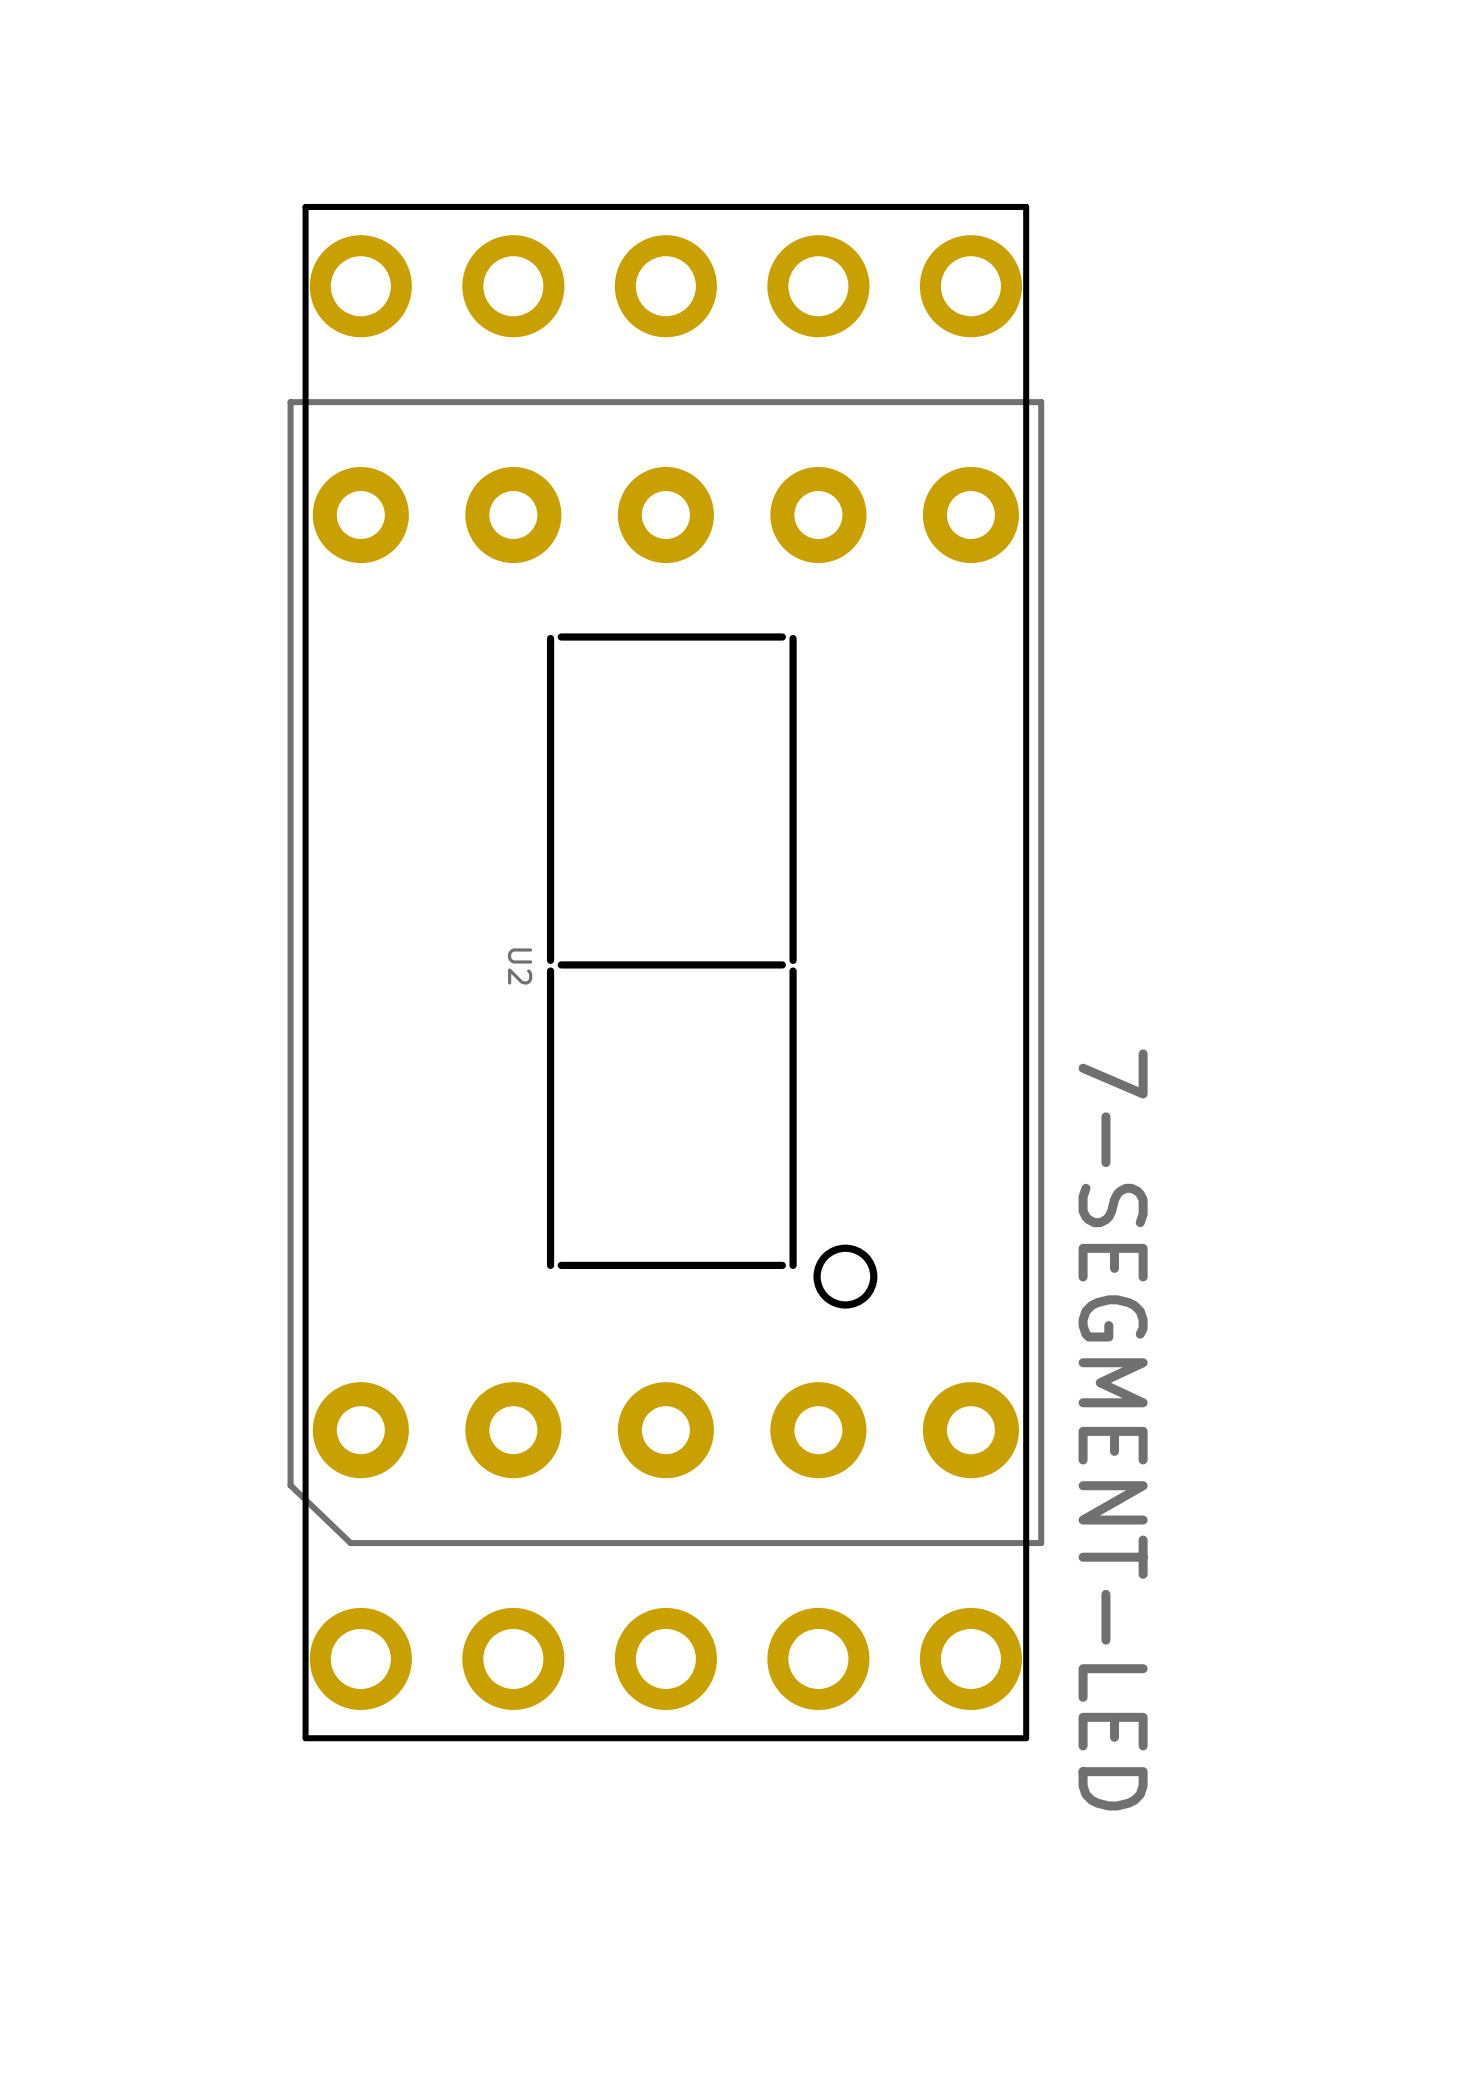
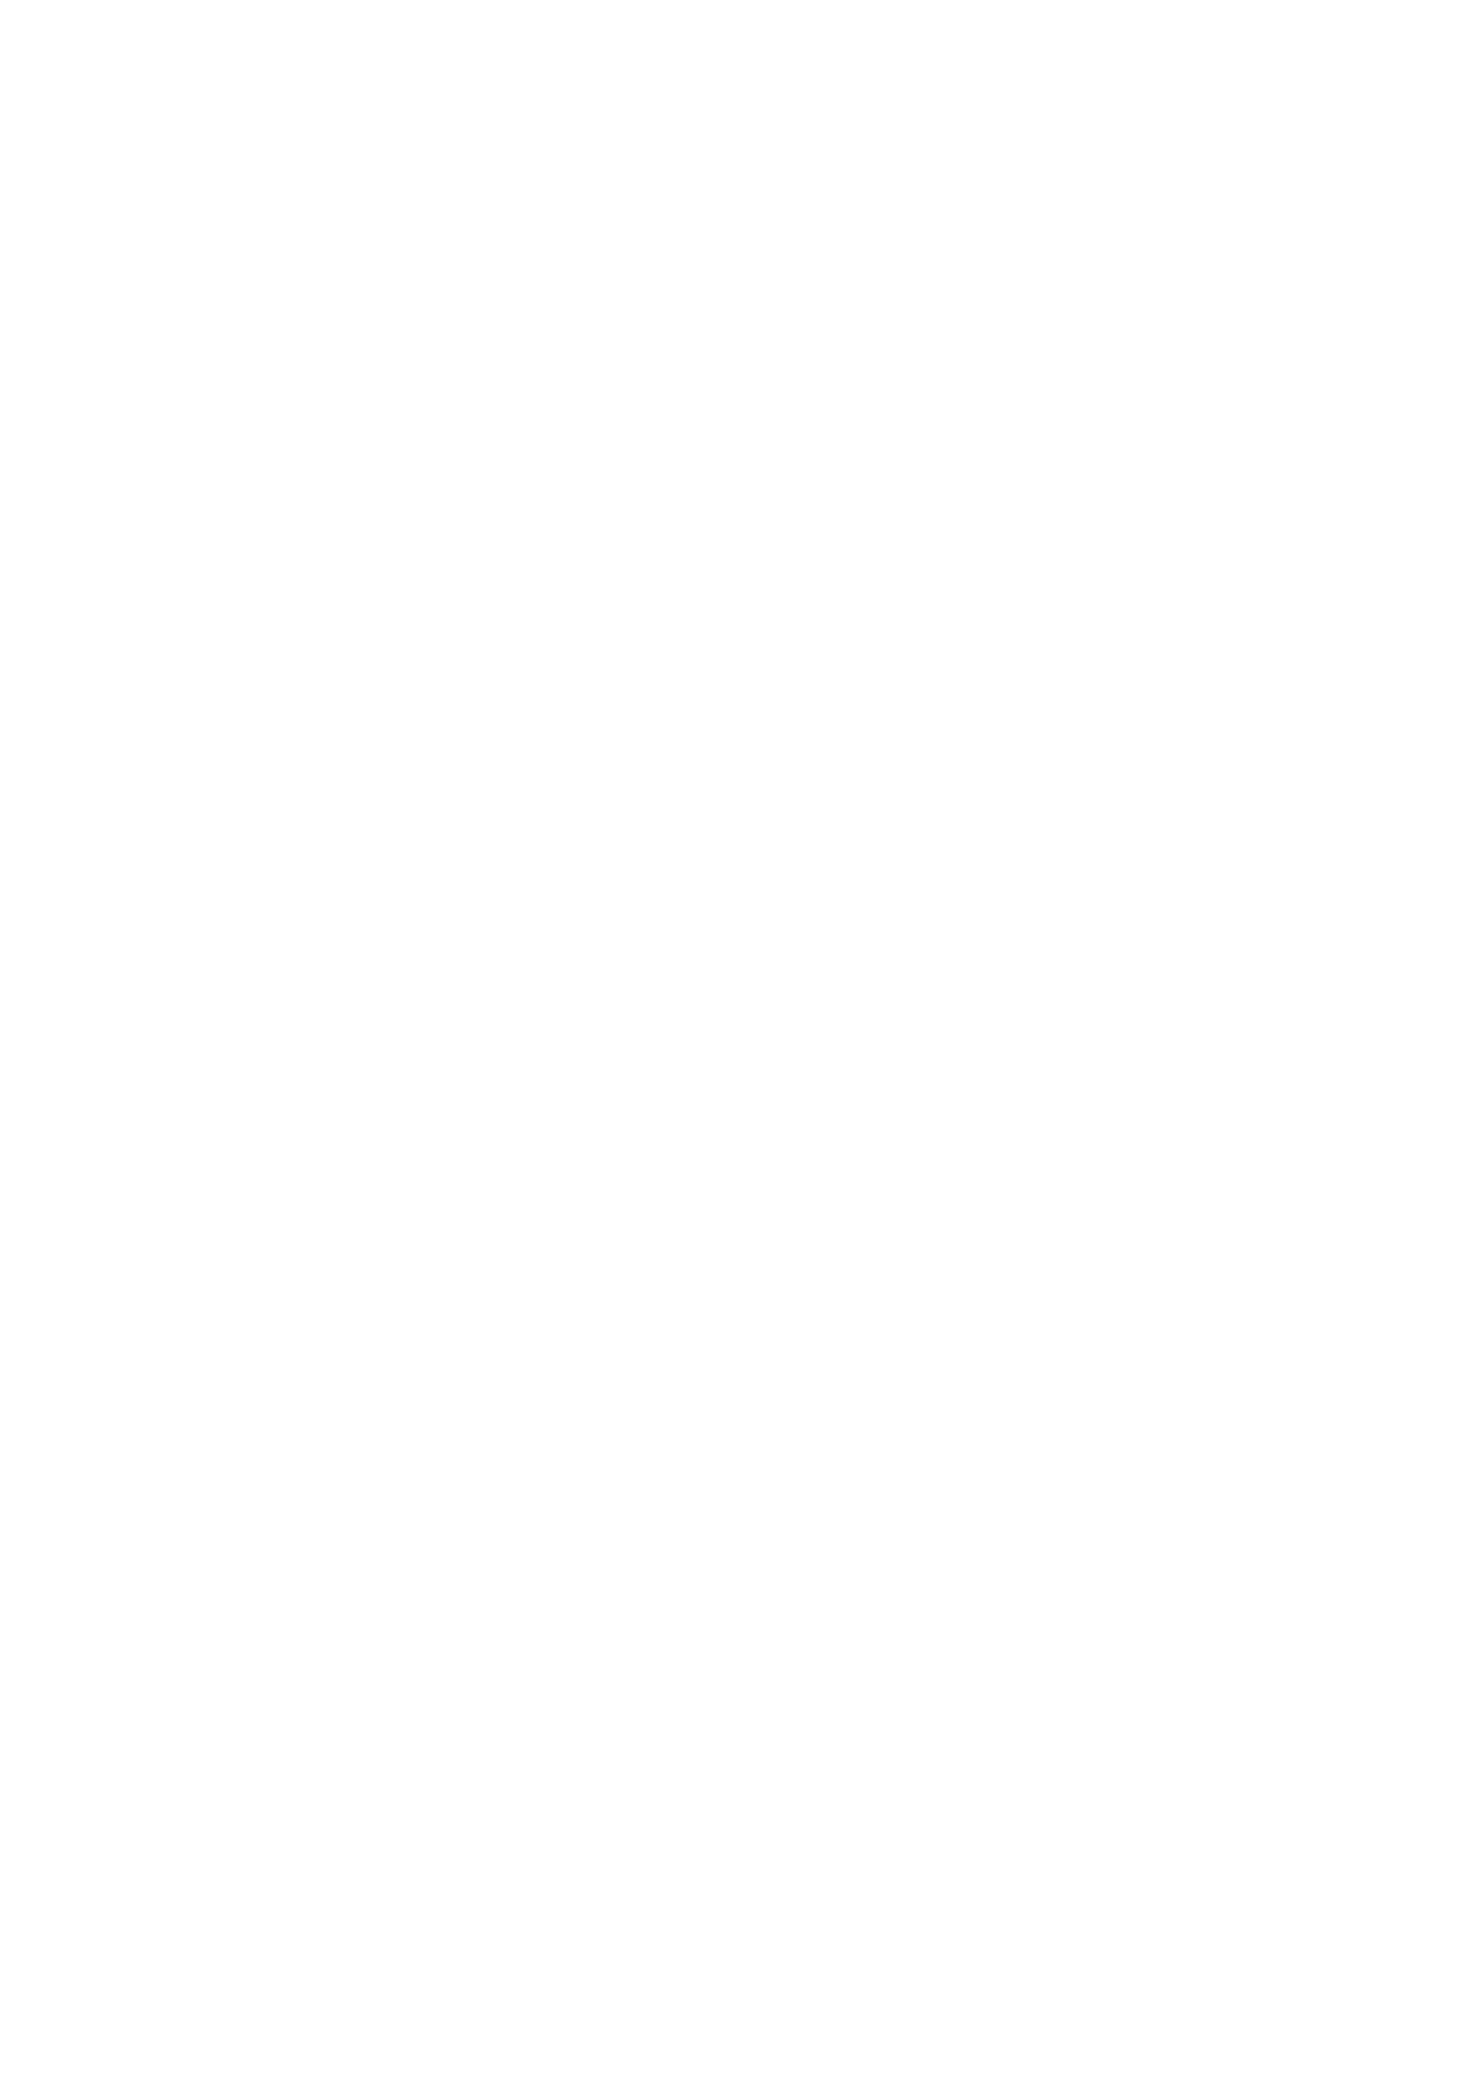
board edge: (1026, 206) (305, 206) (305, 1738) (1026, 1738) (1026, 206) -> none
part: (665, 286) -> none
U2: 7-SEGMENT-LED (665, 972) -> none
part: (665, 1658) -> none

